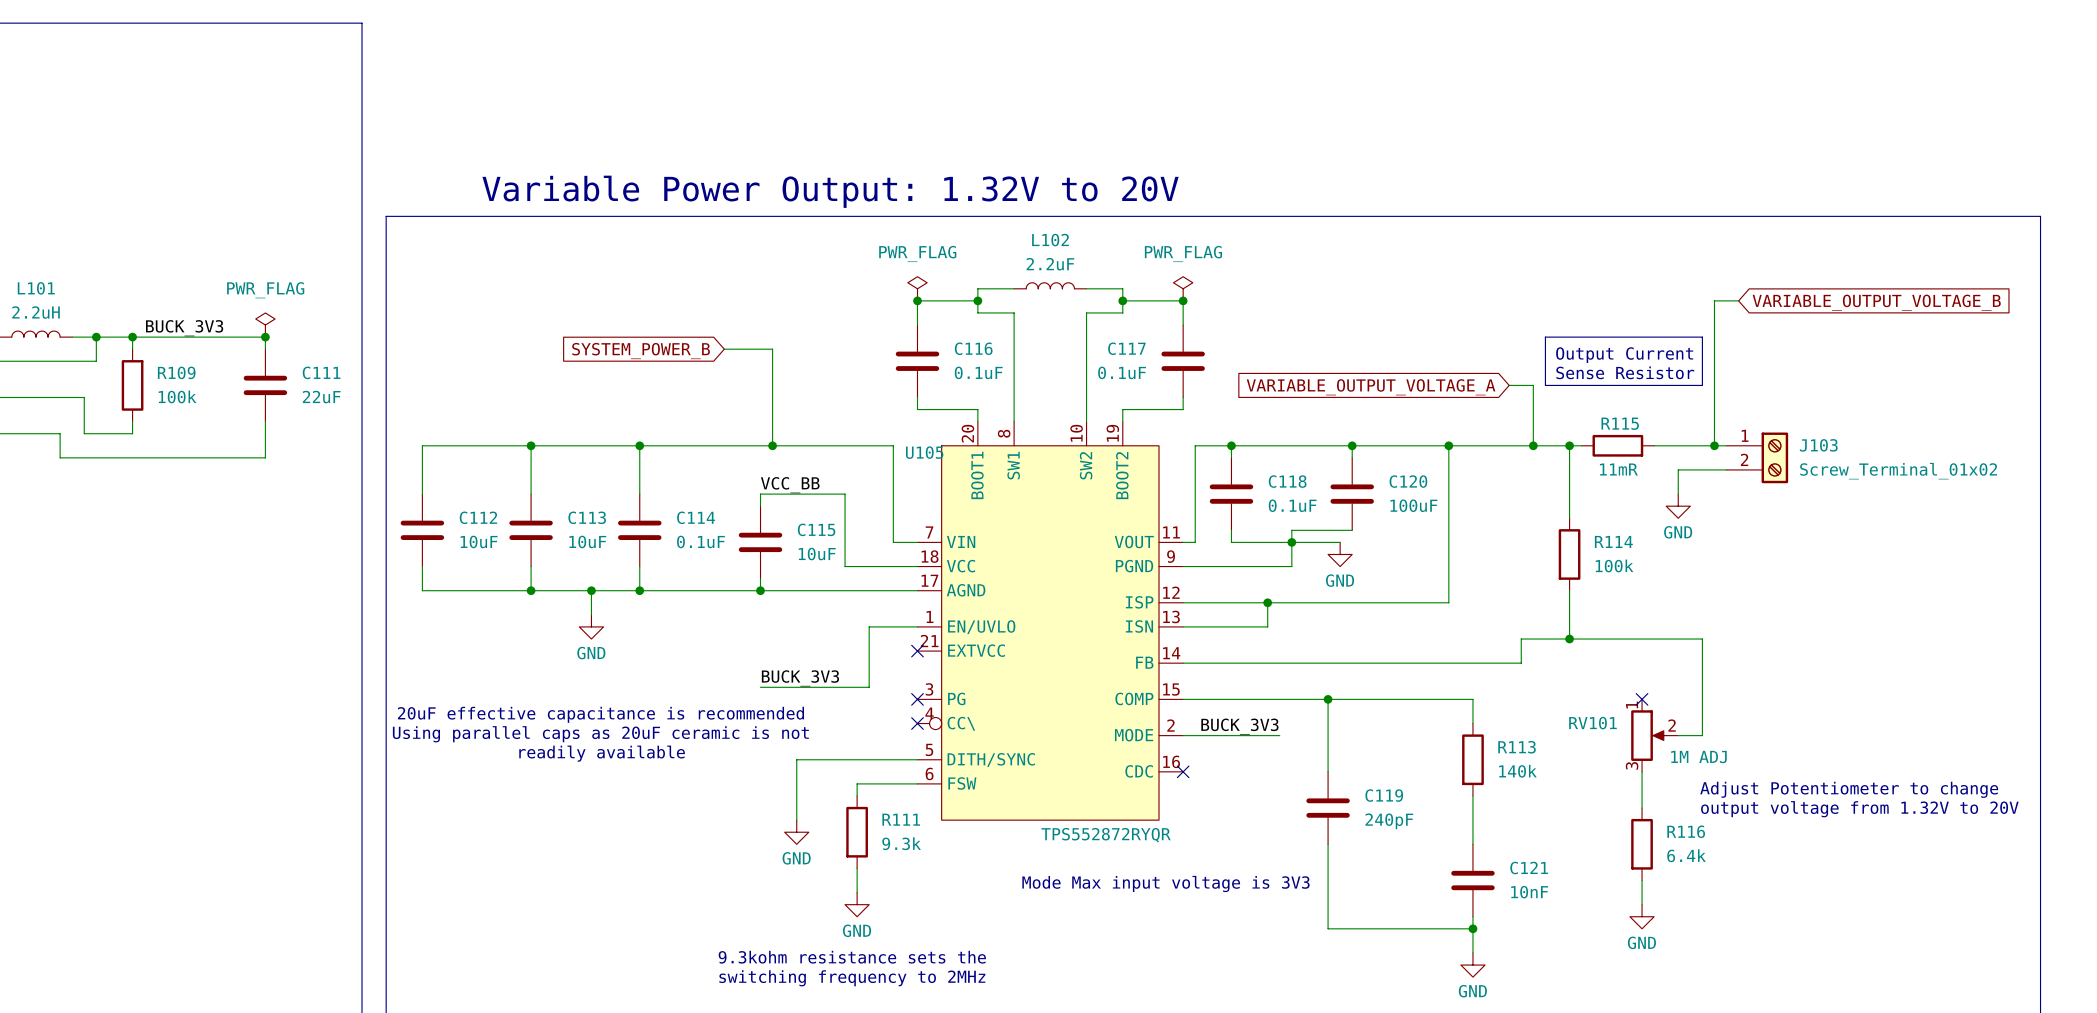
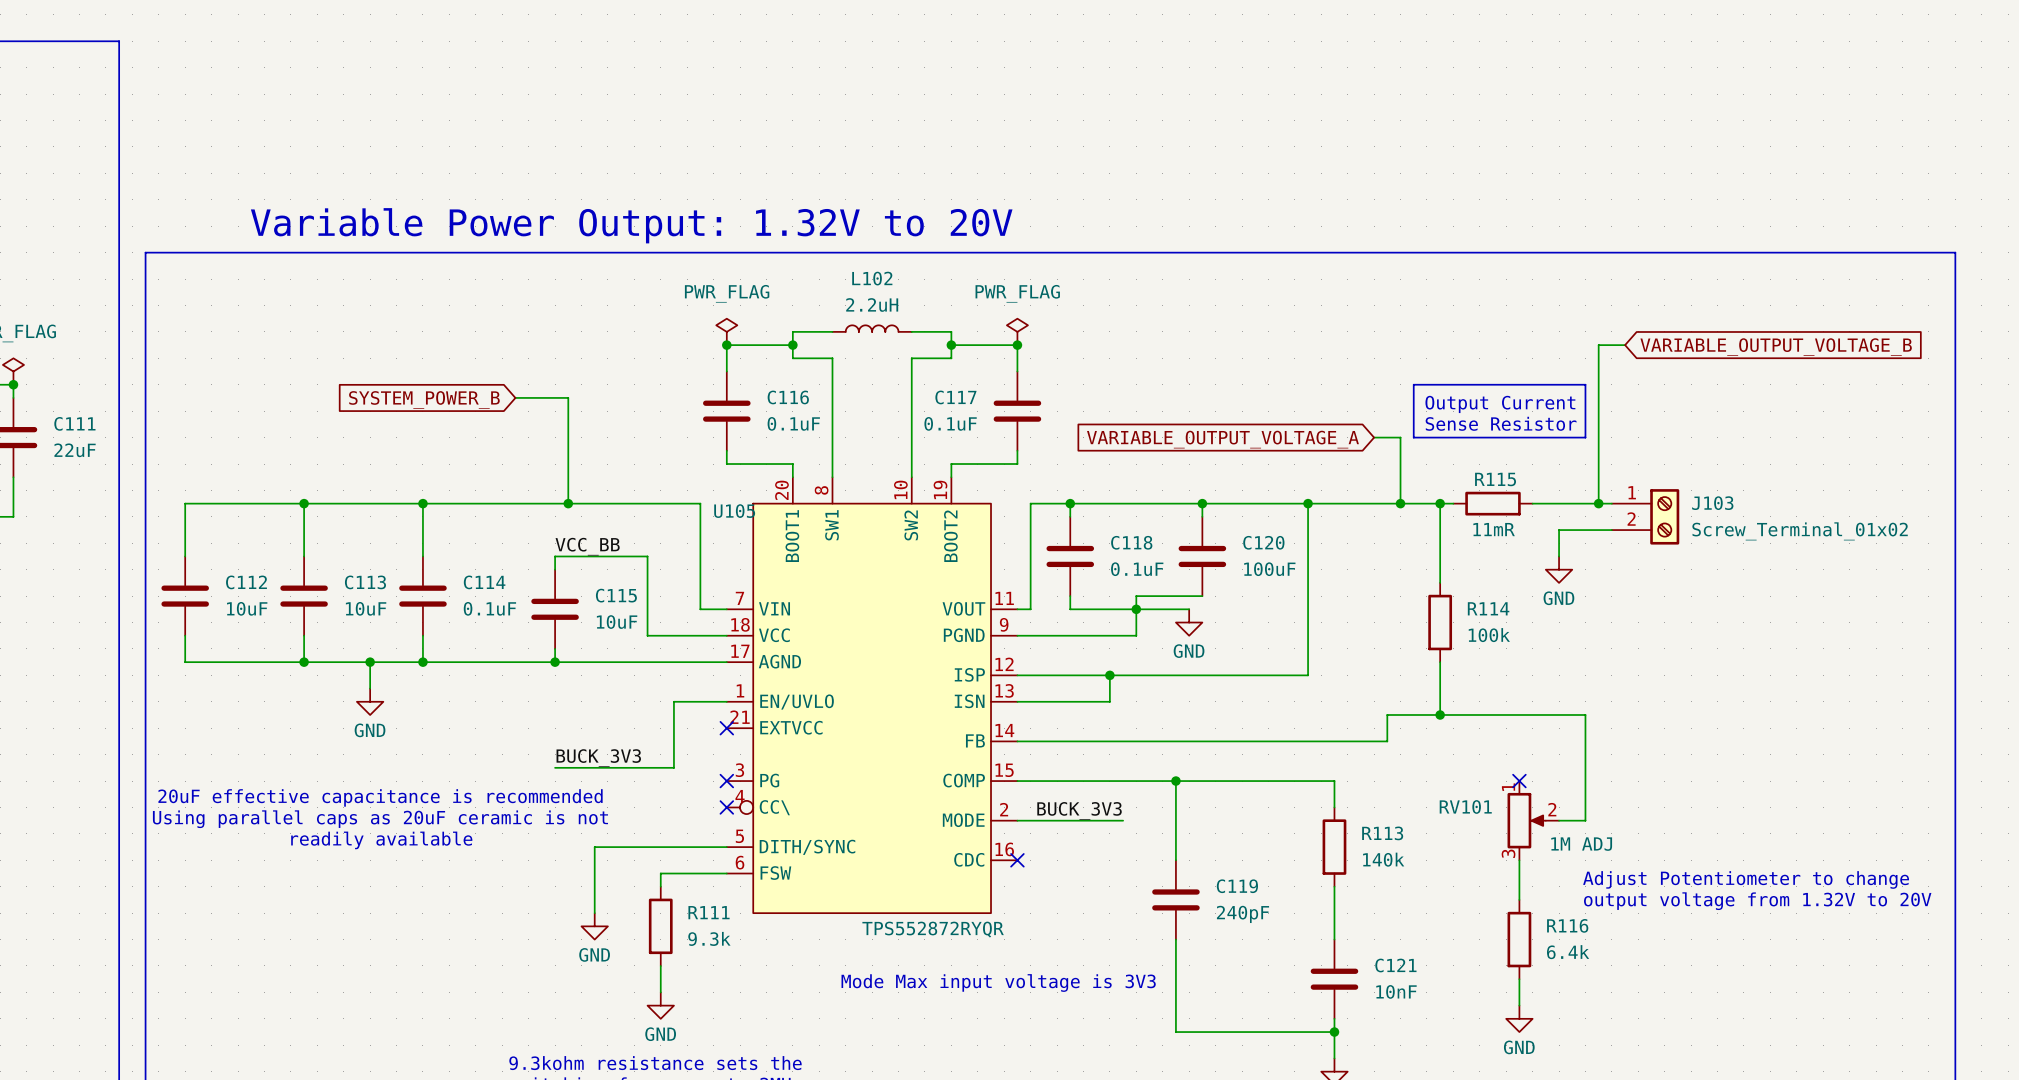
L102 value: 2.2uF (1050, 264) -> 2.2uH (872, 305)

